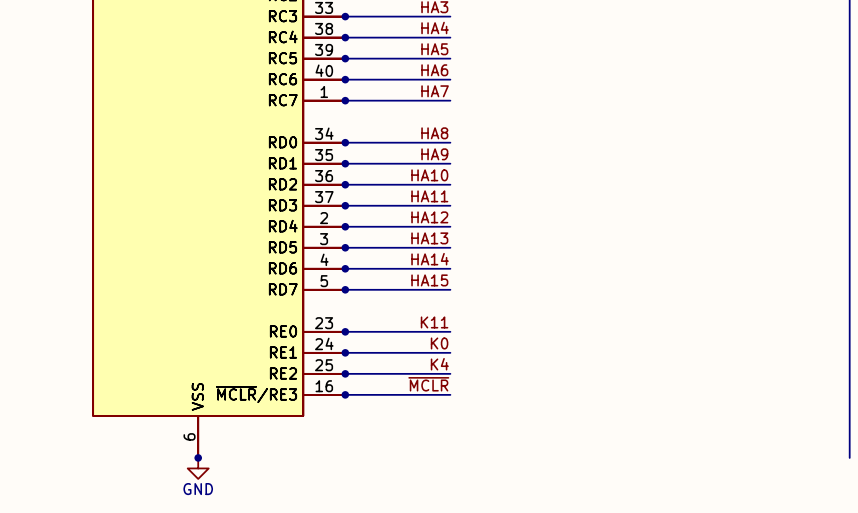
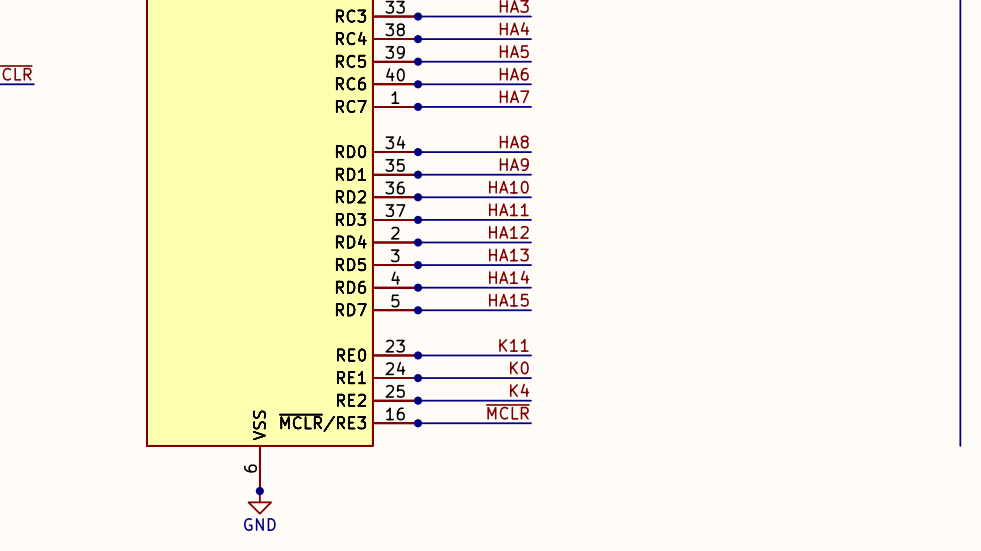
line: (849, 415) (849, 457) -> none

